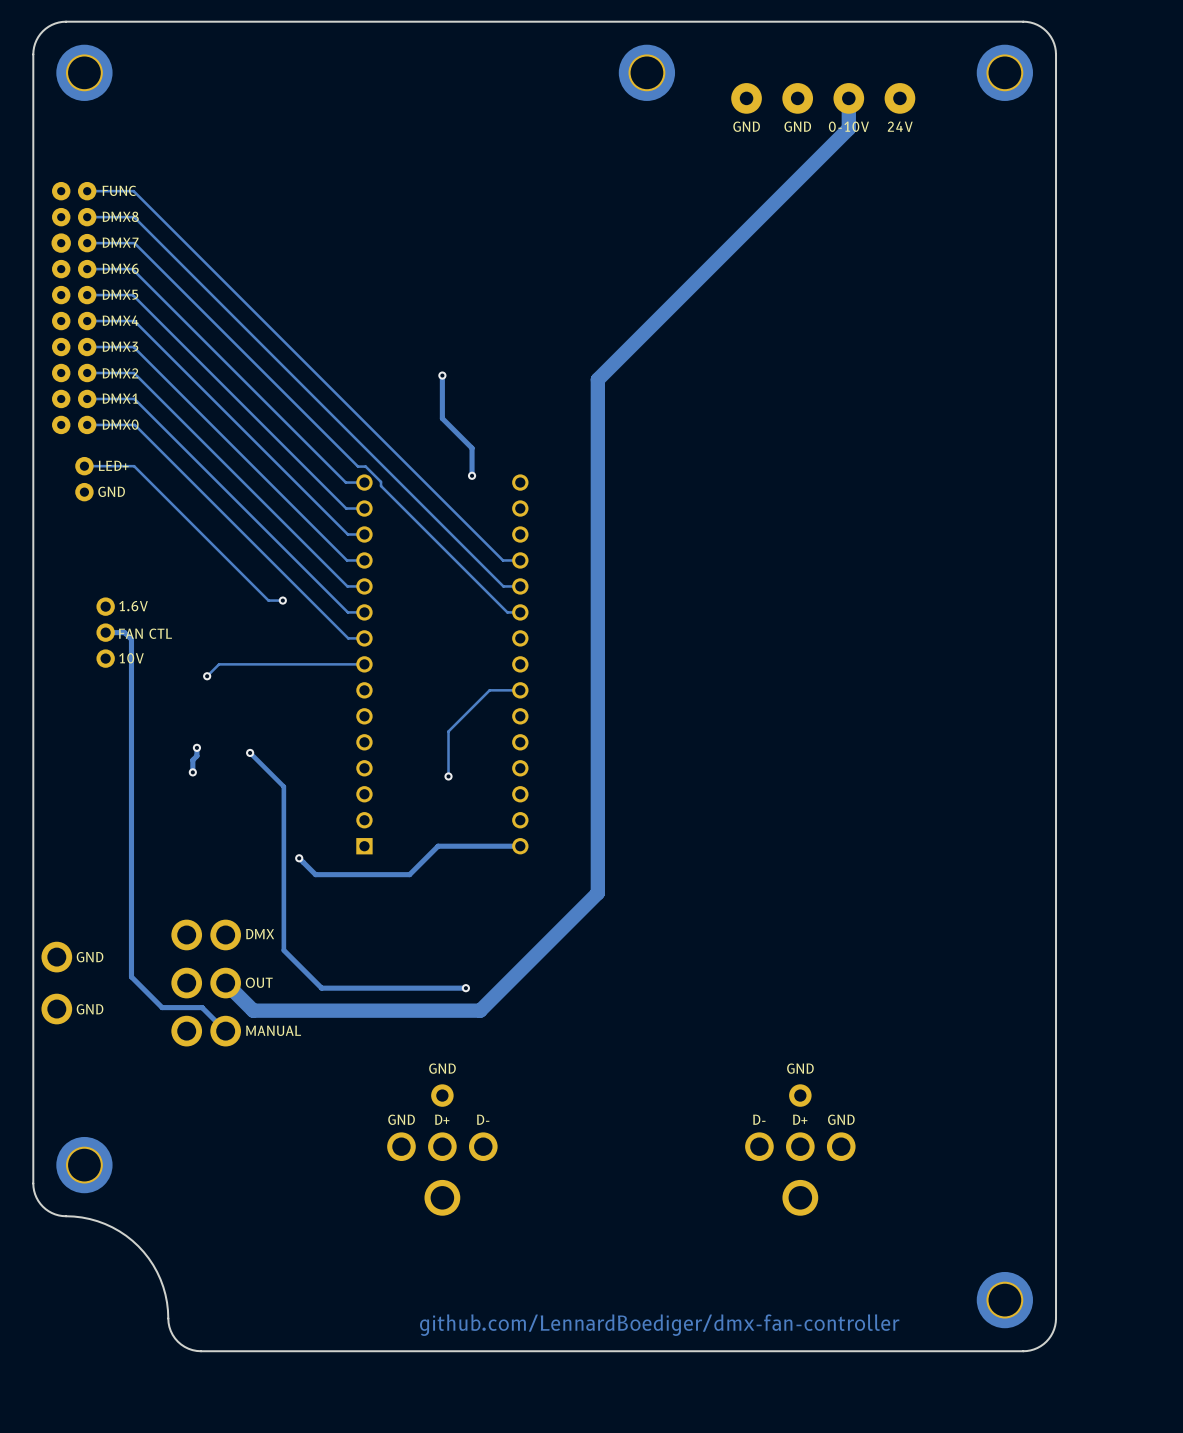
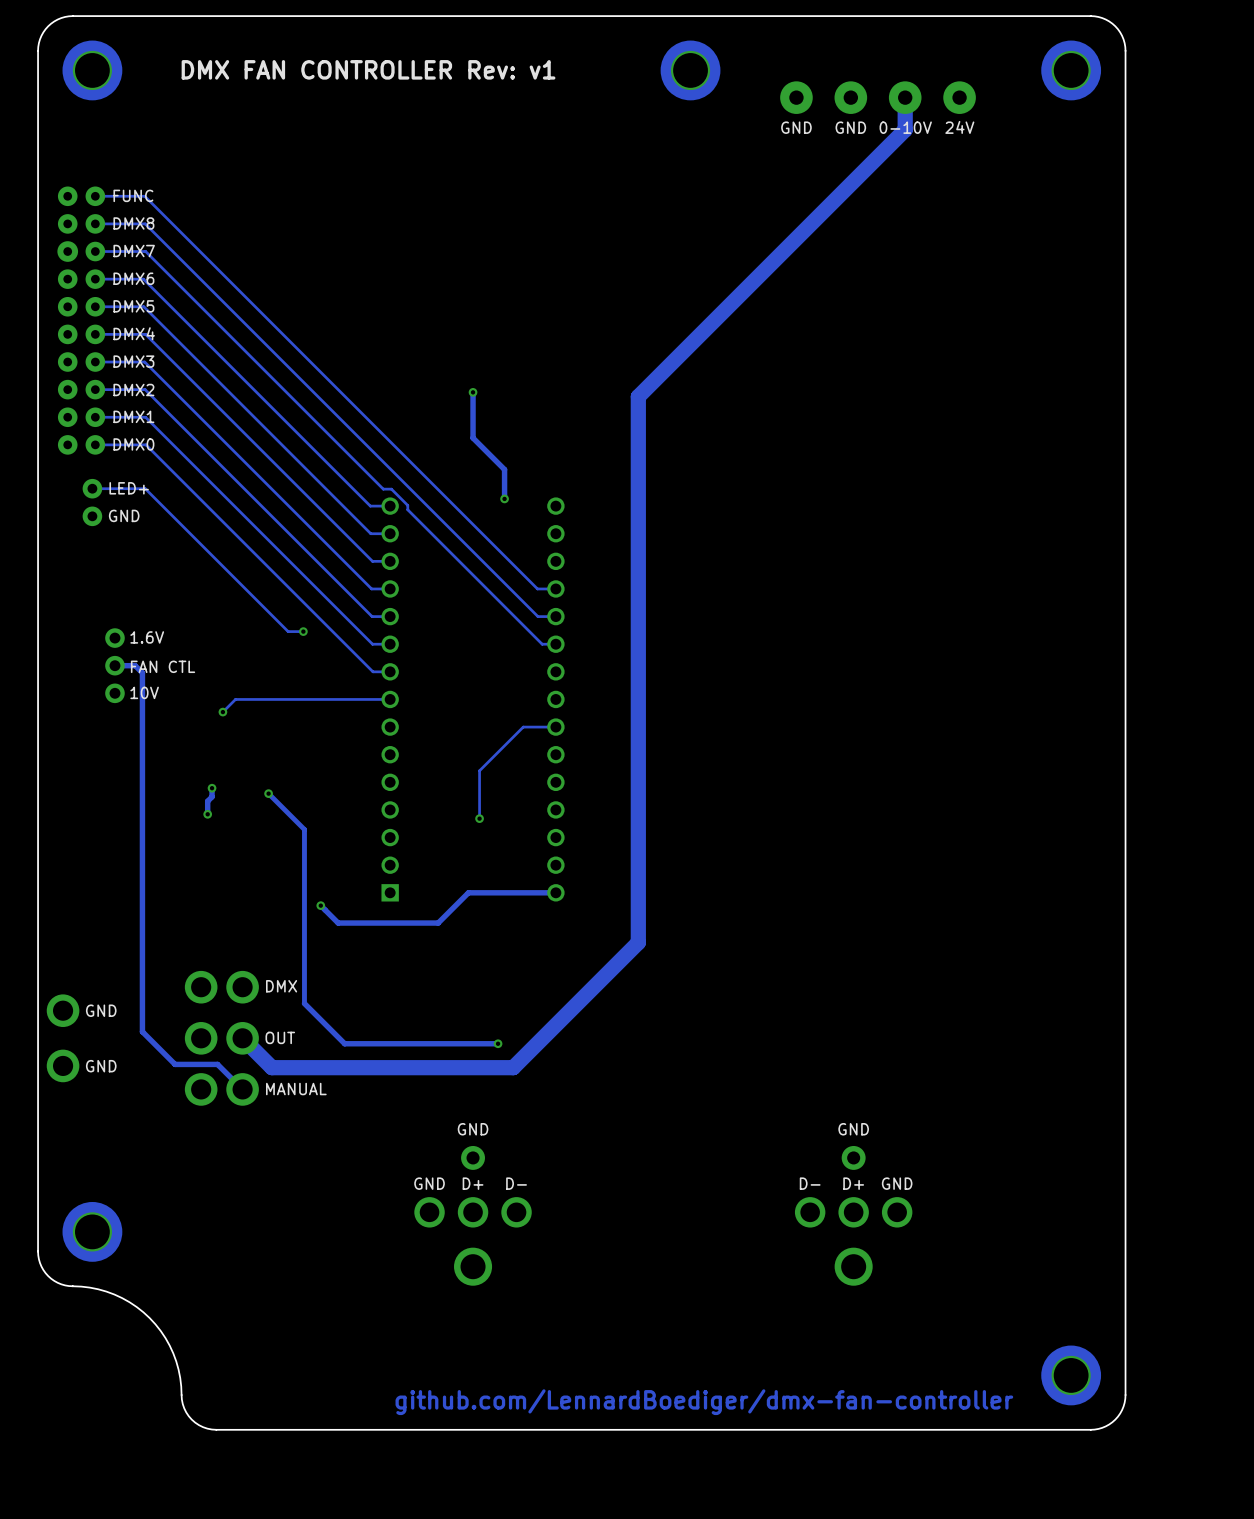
text: none -> DMX FAN CONTROLLER Rev: v1 (368, 69)

